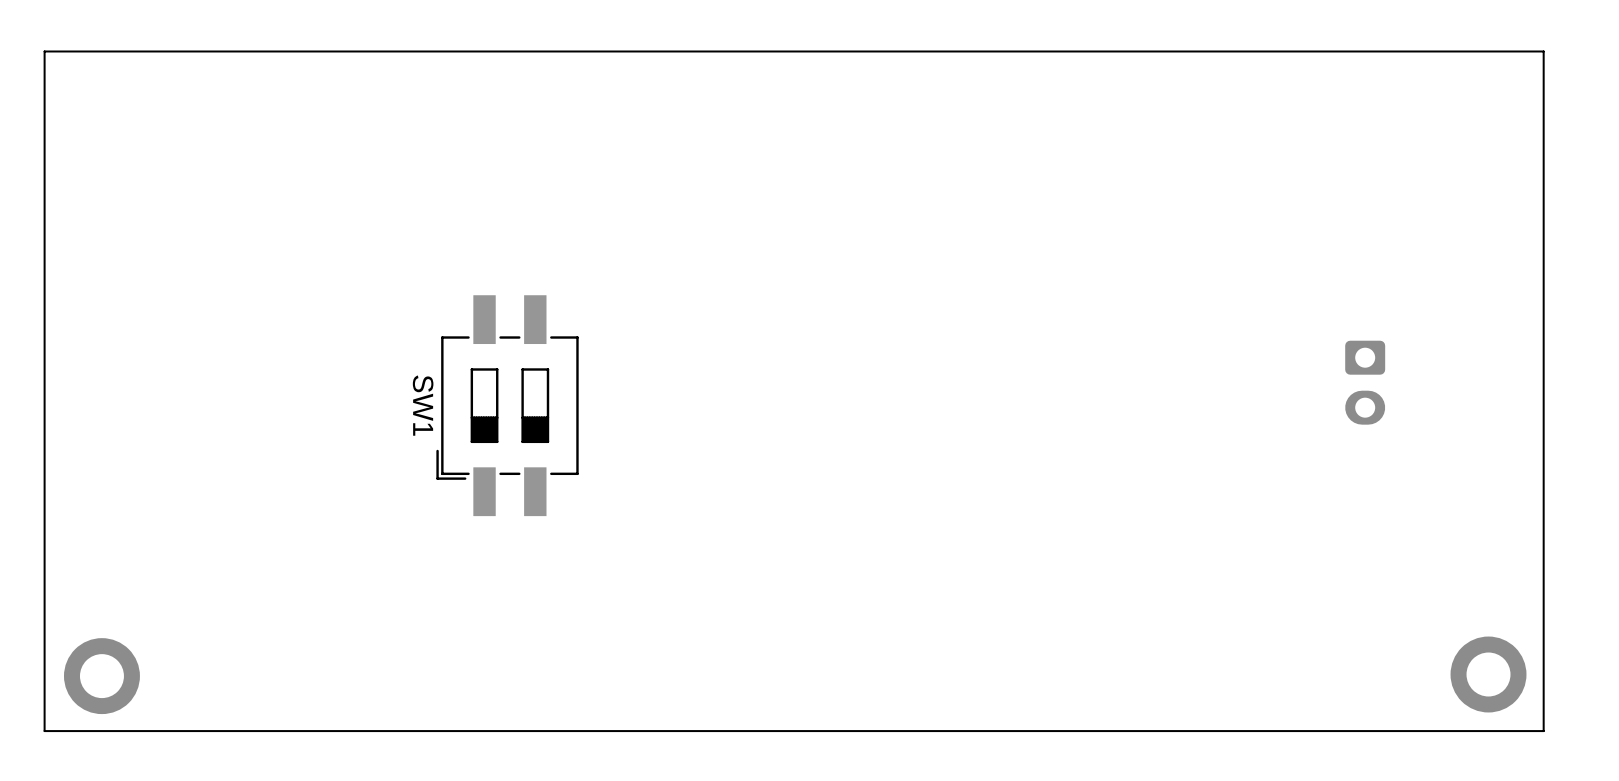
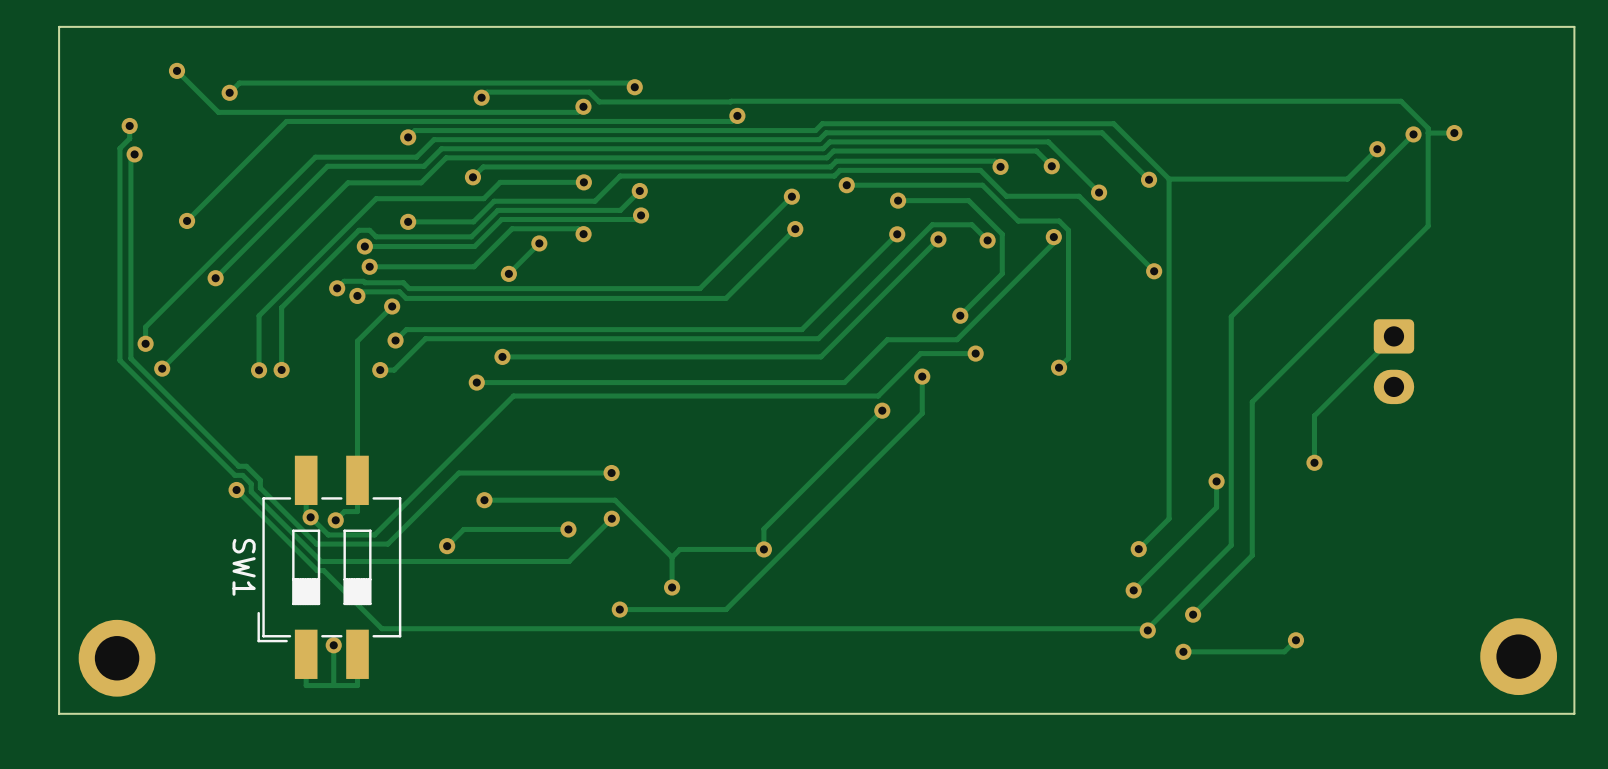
track: none -> (177, 70) (218, 112) (577, 112) (583, 106)
via: none -> (177, 70)
track: none -> (634, 87) (630, 83) (239, 83) (229, 92)
via: none -> (634, 87)
via: none -> (229, 92)
track: none -> (481, 97) (487, 92) (589, 92) (599, 101) (1401, 101) (1428, 128) (1428, 226) (1252, 402) (1252, 555) (1193, 614)
via: none -> (481, 97)
via: none -> (583, 106)
track: none -> (737, 115) (731, 121) (286, 121) (187, 220)
via: none -> (737, 115)
track: none -> (129, 125) (129, 138) (119, 148) (119, 360) (234, 475) (242, 475) (251, 483) (251, 491) (321, 561) (569, 561) (611, 518)
via: none -> (129, 125)
track: none -> (1454, 133) (1428, 133)
via: none -> (1454, 133)
track: none -> (1413, 134) (1231, 316) (1231, 545) (1147, 628)
via: none -> (1413, 134)
track: none -> (408, 137) (414, 130) (815, 130) (822, 123) (1113, 123) (1169, 179)
via: none -> (408, 137)
track: none -> (1377, 149) (1347, 179) (1169, 179)
via: none -> (1377, 149)
track: none -> (134, 154) (130, 158) (130, 358) (238, 466) (246, 466) (260, 480) (260, 487) (316, 544) (387, 544) (458, 473) (611, 473)
via: none -> (134, 154)
track: none -> (1000, 166) (994, 161) (836, 161) (830, 166) (483, 166) (472, 177)
via: none -> (1000, 166)
track: none -> (1051, 166) (1036, 151) (833, 151) (826, 157) (446, 157) (421, 182) (348, 182) (162, 368)
via: none -> (1051, 166)
via: none -> (472, 177)
track: none -> (1149, 179) (1102, 132) (826, 132) (819, 139) (434, 139) (416, 157) (315, 157) (145, 327) (145, 343)
via: none -> (1149, 179)
track: none -> (1169, 179) (1169, 518) (1138, 549)
track: none -> (583, 182) (500, 182) (483, 198) (376, 198) (259, 315) (259, 370)
via: none -> (583, 182)
track: none -> (846, 185) (982, 185) (1018, 221) (1059, 221) (1068, 230) (1068, 358) (1059, 367)
via: none -> (846, 185)
track: none -> (639, 191) (620, 210) (497, 210) (471, 236) (376, 236) (369, 230) (358, 230) (281, 307) (281, 369)
via: none -> (639, 191)
track: none -> (1099, 192) (1048, 141) (829, 141) (823, 148) (441, 148) (424, 166) (327, 166) (215, 278)
via: none -> (1099, 192)
track: none -> (791, 196) (699, 288) (409, 288) (403, 282) (363, 281) (344, 281) (337, 288)
via: none -> (791, 196)
track: none -> (898, 200) (968, 200) (1002, 234) (1002, 273) (960, 315)
via: none -> (898, 200)
track: none -> (641, 215) (637, 219) (501, 219) (474, 246) (364, 246)
via: none -> (641, 215)
via: none -> (187, 220)
track: none -> (408, 221) (473, 221) (494, 201) (595, 201) (620, 176) (834, 176) (840, 170) (980, 170) (1006, 196) (1079, 196) (1154, 271)
via: none -> (408, 221)
track: none -> (795, 229) (725, 298) (406, 298) (399, 291) (361, 291) (357, 295)
via: none -> (795, 229)
track: none -> (583, 234) (578, 228) (512, 228) (474, 266) (369, 266)
via: none -> (583, 234)
track: none -> (897, 234) (801, 329) (406, 329) (395, 340)
via: none -> (897, 234)
track: none -> (1053, 237) (1053, 242) (957, 339) (887, 339) (844, 382) (476, 382)
via: none -> (1053, 237)
track: none -> (938, 239) (820, 356) (502, 356)
via: none -> (938, 239)
track: none -> (987, 240) (971, 224) (932, 224) (818, 338) (425, 338) (394, 370) (380, 370)
via: none -> (987, 240)
track: none -> (539, 243) (508, 273)
via: none -> (539, 243)
via: none -> (364, 246)
via: none -> (369, 266)
via: none -> (1154, 271)
via: none -> (508, 273)
via: none -> (215, 278)
via: none -> (337, 288)
via: none -> (357, 295)
track: none -> (392, 306) (357, 341) (357, 511) (344, 511) (335, 520)
via: none -> (392, 306)
via: none -> (960, 315)
track: none -> (1393, 336) (1314, 415) (1314, 462)
via: none -> (395, 340)
via: none -> (145, 343)
track: none -> (975, 353) (920, 353) (878, 396) (513, 396) (374, 534) (328, 534) (306, 511) (306, 480)
via: none -> (975, 353)
via: none -> (502, 356)
via: none -> (1059, 367)
via: none -> (162, 368)
via: none -> (281, 369)
via: none -> (259, 370)
via: none -> (380, 370)
track: none -> (922, 376) (922, 413) (726, 609) (619, 609)
via: none -> (922, 376)
via: none -> (476, 382)
SW1 position: (507, 405) -> (329, 567)
track: none -> (882, 410) (763, 529) (763, 549) (679, 549) (672, 557)
via: none -> (882, 410)
via: none -> (1314, 462)
via: none -> (611, 473)
track: none -> (1216, 481) (1216, 507) (1133, 590)
via: none -> (1216, 481)
track: none -> (236, 490) (317, 570) (323, 570) (381, 628) (1147, 628)
via: none -> (236, 490)
track: none -> (484, 500) (615, 500) (672, 557)
via: none -> (484, 500)
via: none -> (310, 517)
via: none -> (611, 518)
via: none -> (335, 520)
track: none -> (568, 529) (463, 529) (447, 546)
via: none -> (568, 529)
via: none -> (447, 546)
via: none -> (763, 549)
via: none -> (1138, 549)
track: none -> (672, 557) (672, 587)
via: none -> (672, 587)
via: none -> (1133, 590)
via: none -> (619, 609)
via: none -> (1193, 614)
via: none -> (1147, 630)
track: none -> (1295, 640) (1284, 651) (1183, 651)
via: none -> (1295, 640)
track: none -> (333, 645) (333, 685)
via: none -> (333, 645)
via: none -> (1183, 651)
track: none -> (357, 654) (357, 685) (306, 685) (306, 654)

